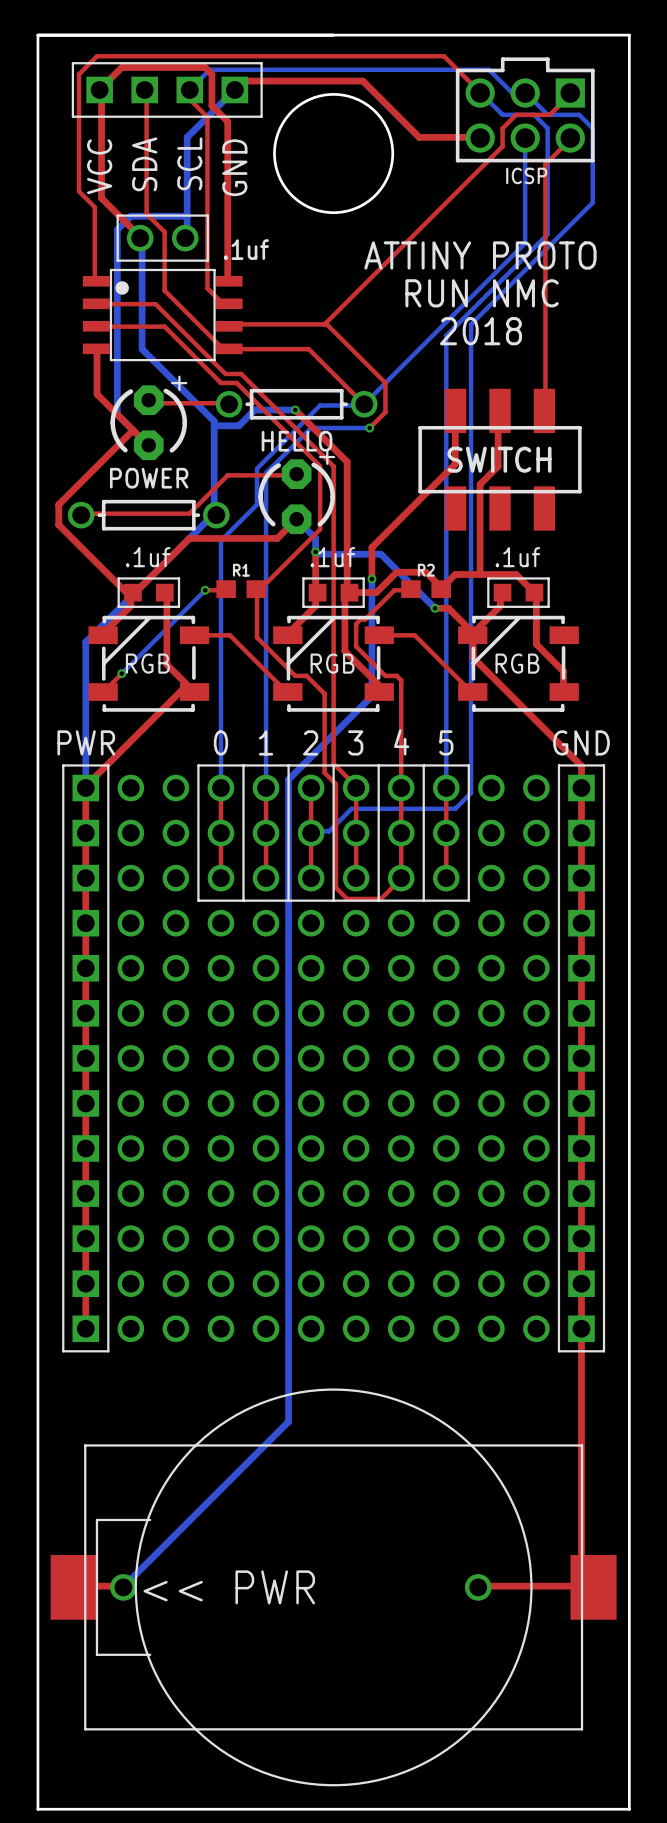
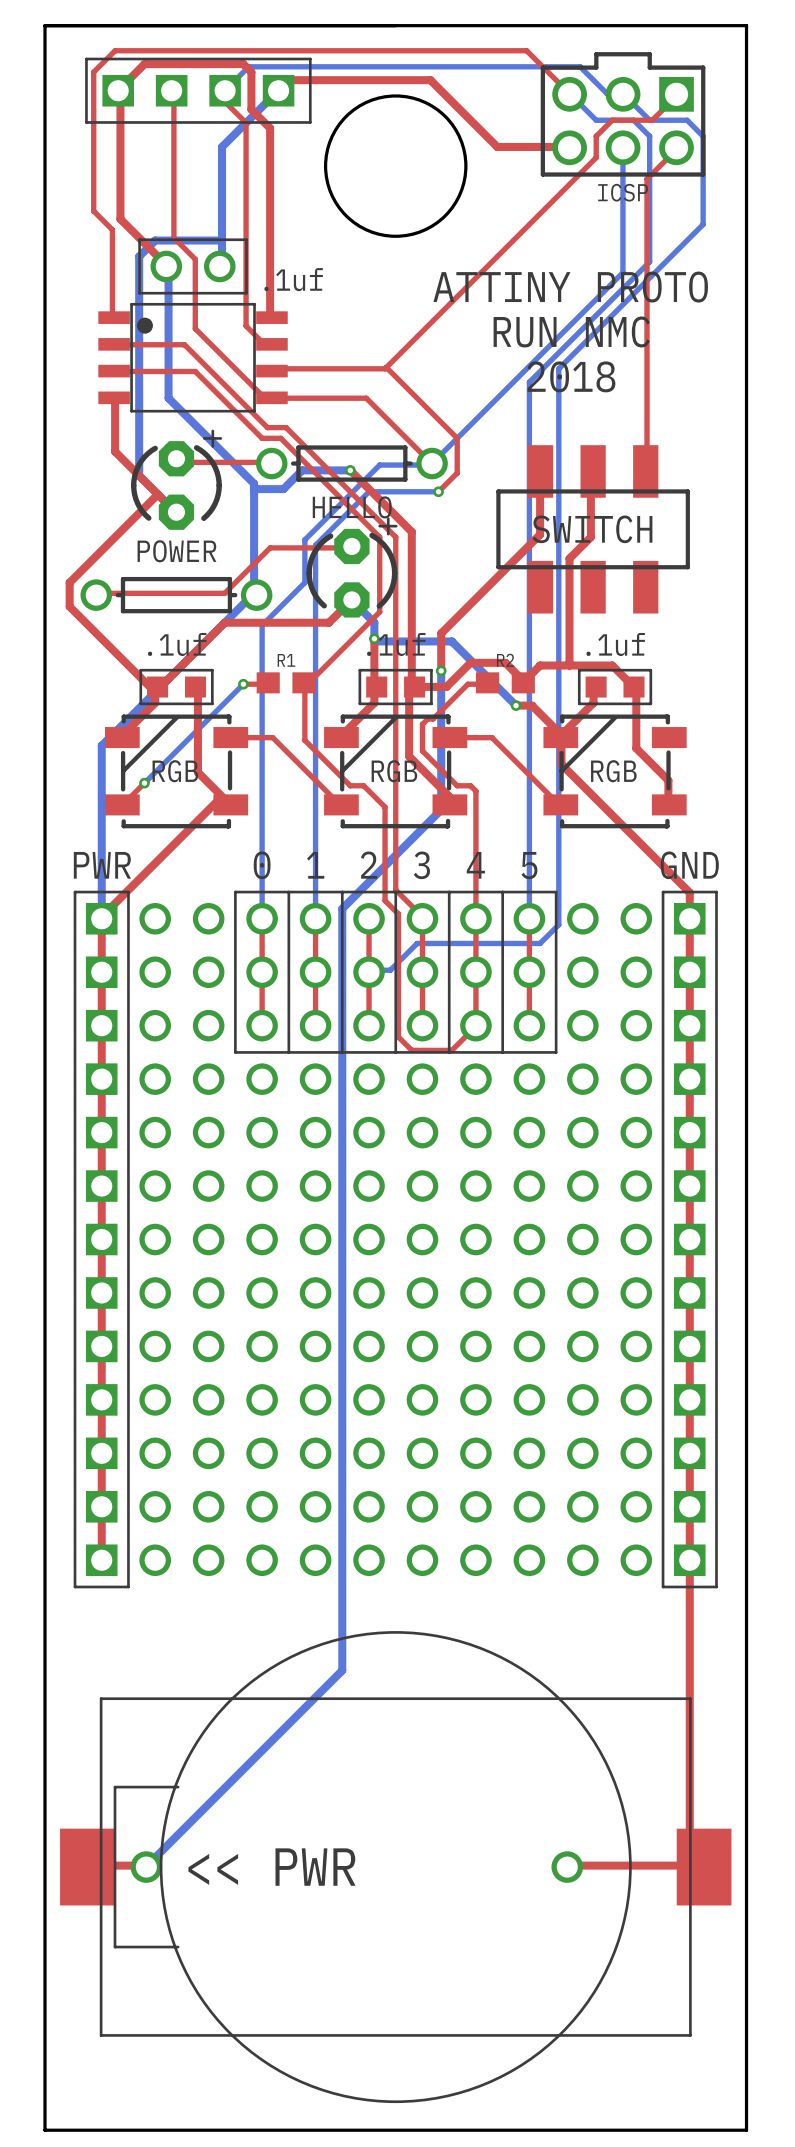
part text: SCL (189, 163) -> none
part text: SDA (144, 164) -> none
part text: VCC (99, 166) -> none
part text: GND (234, 167) -> none

